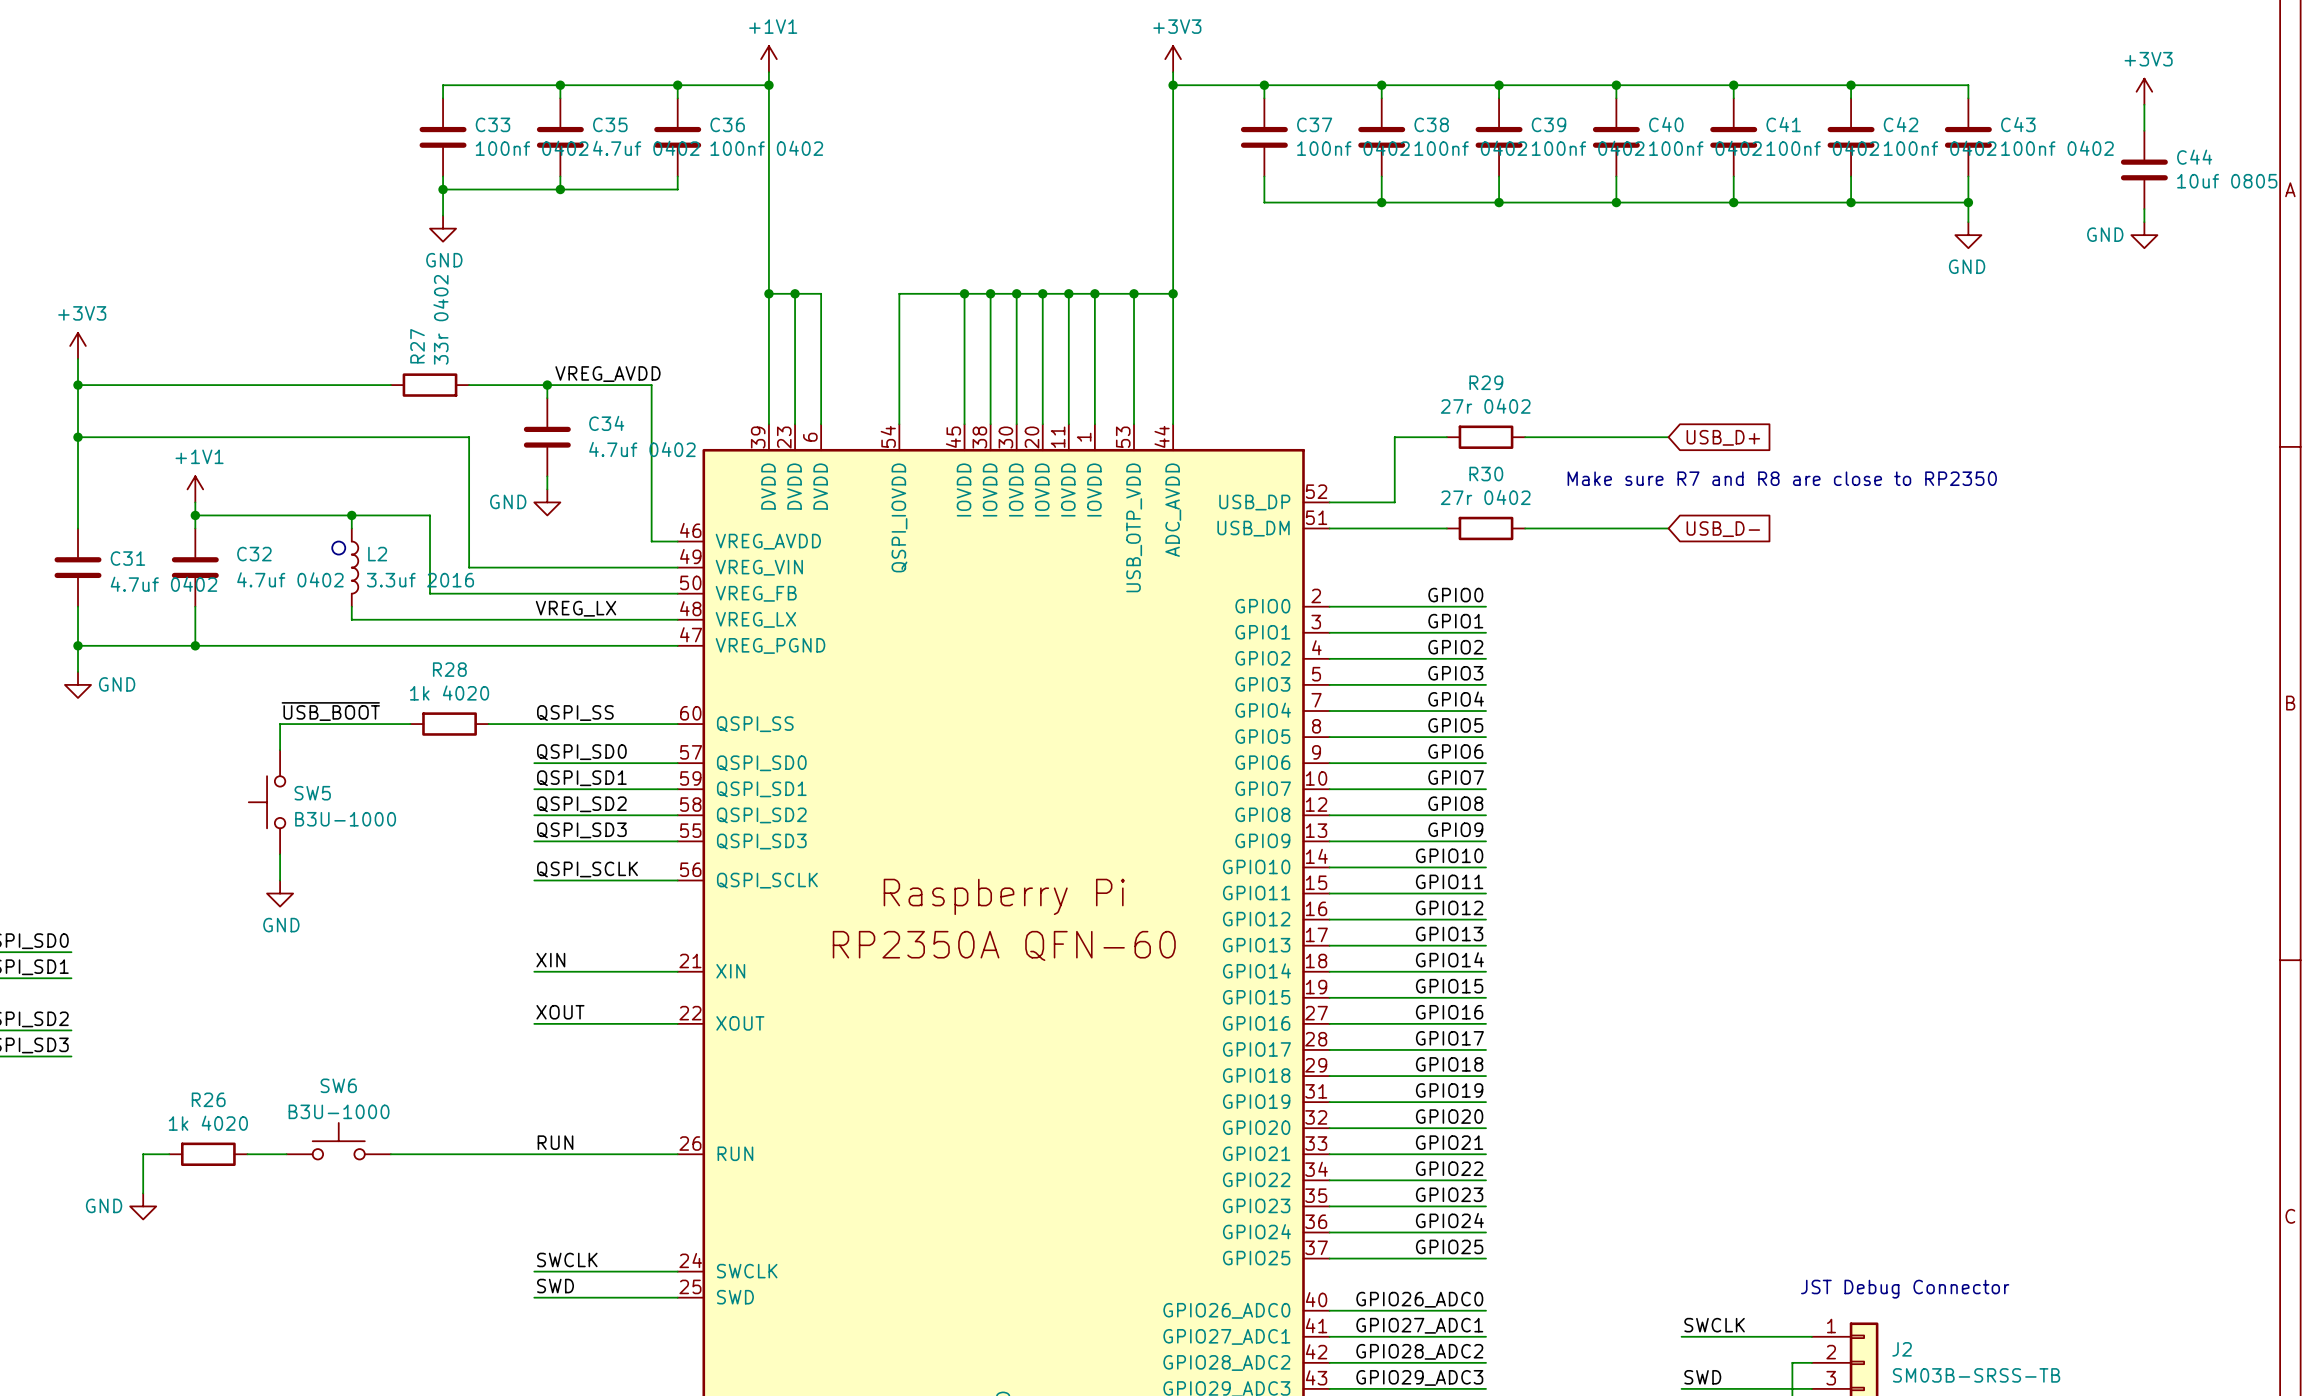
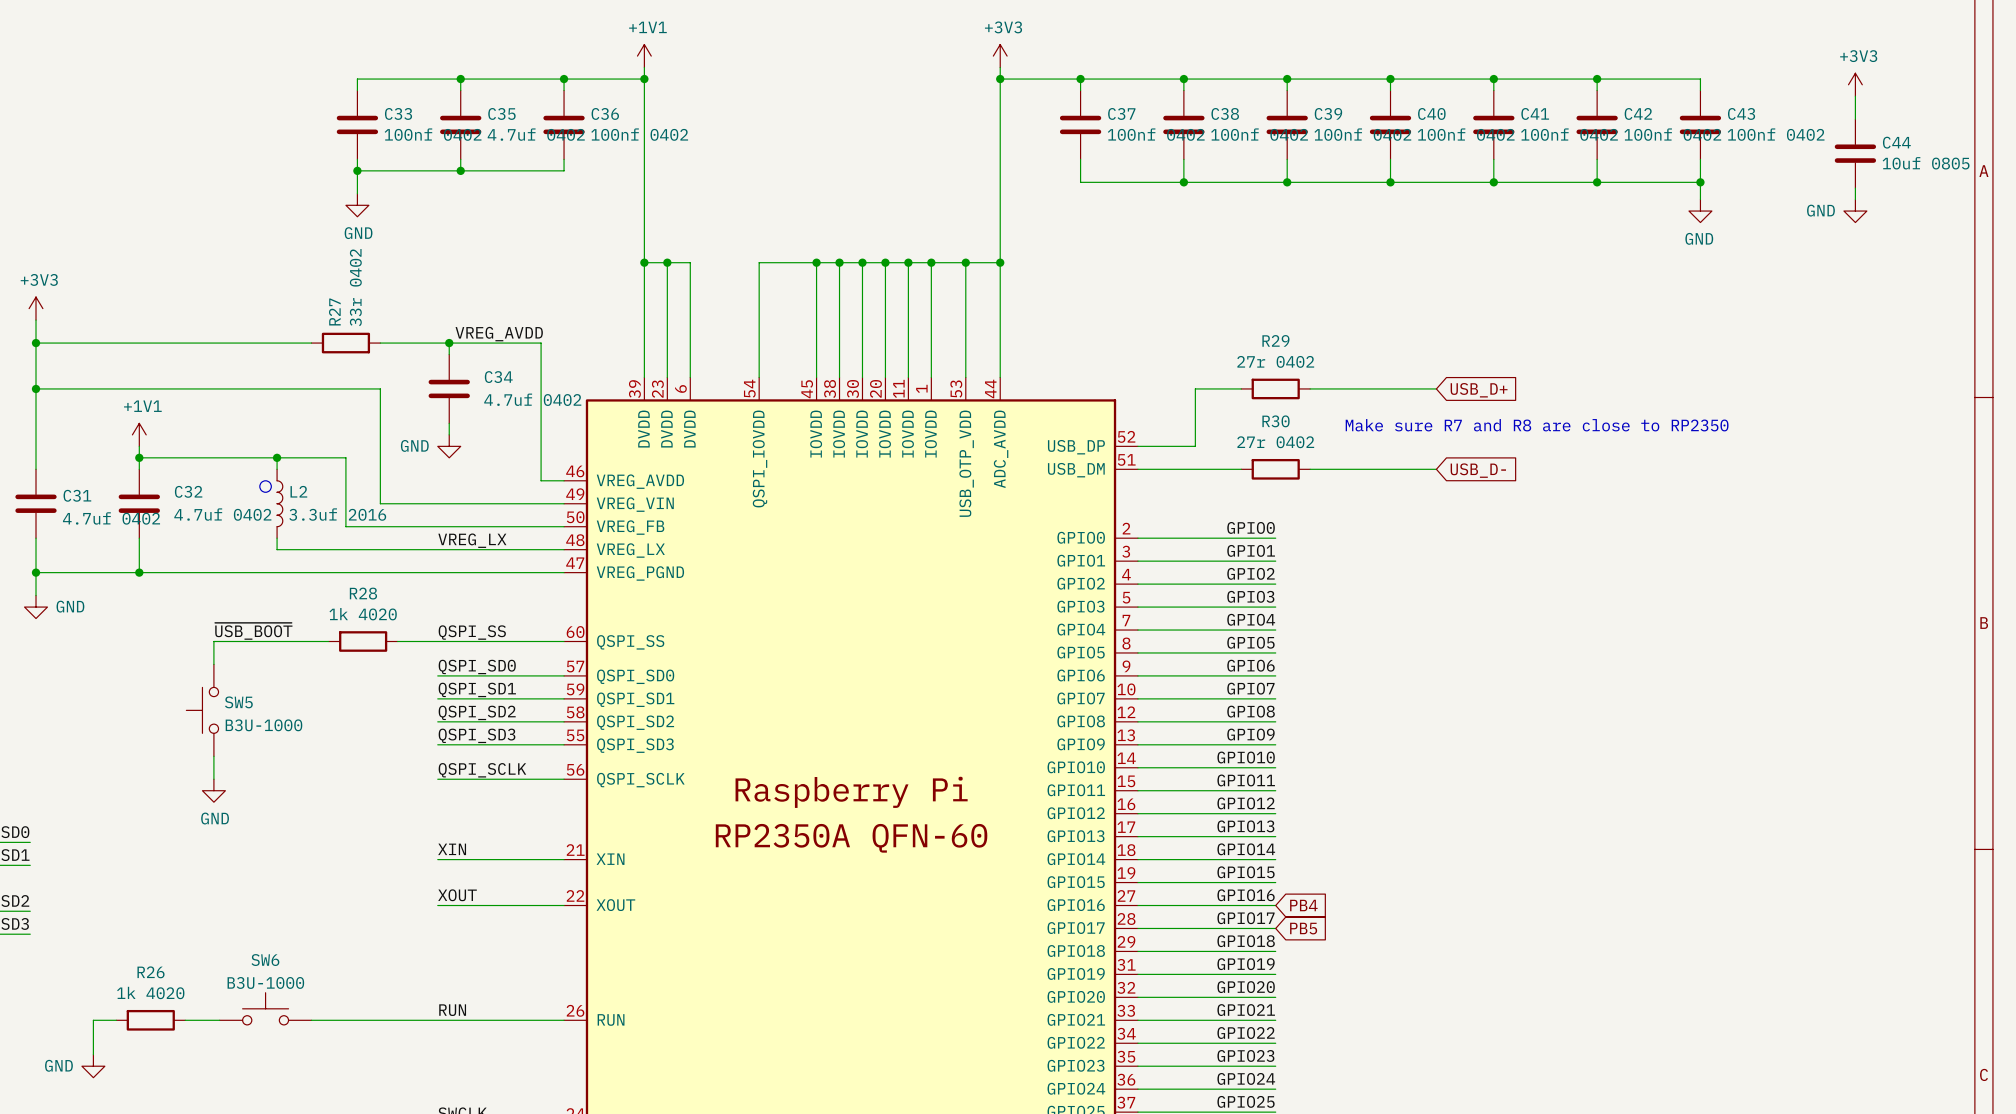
global label: none -> PB4 (1303, 905)
global label: none -> PB5 (1303, 928)

